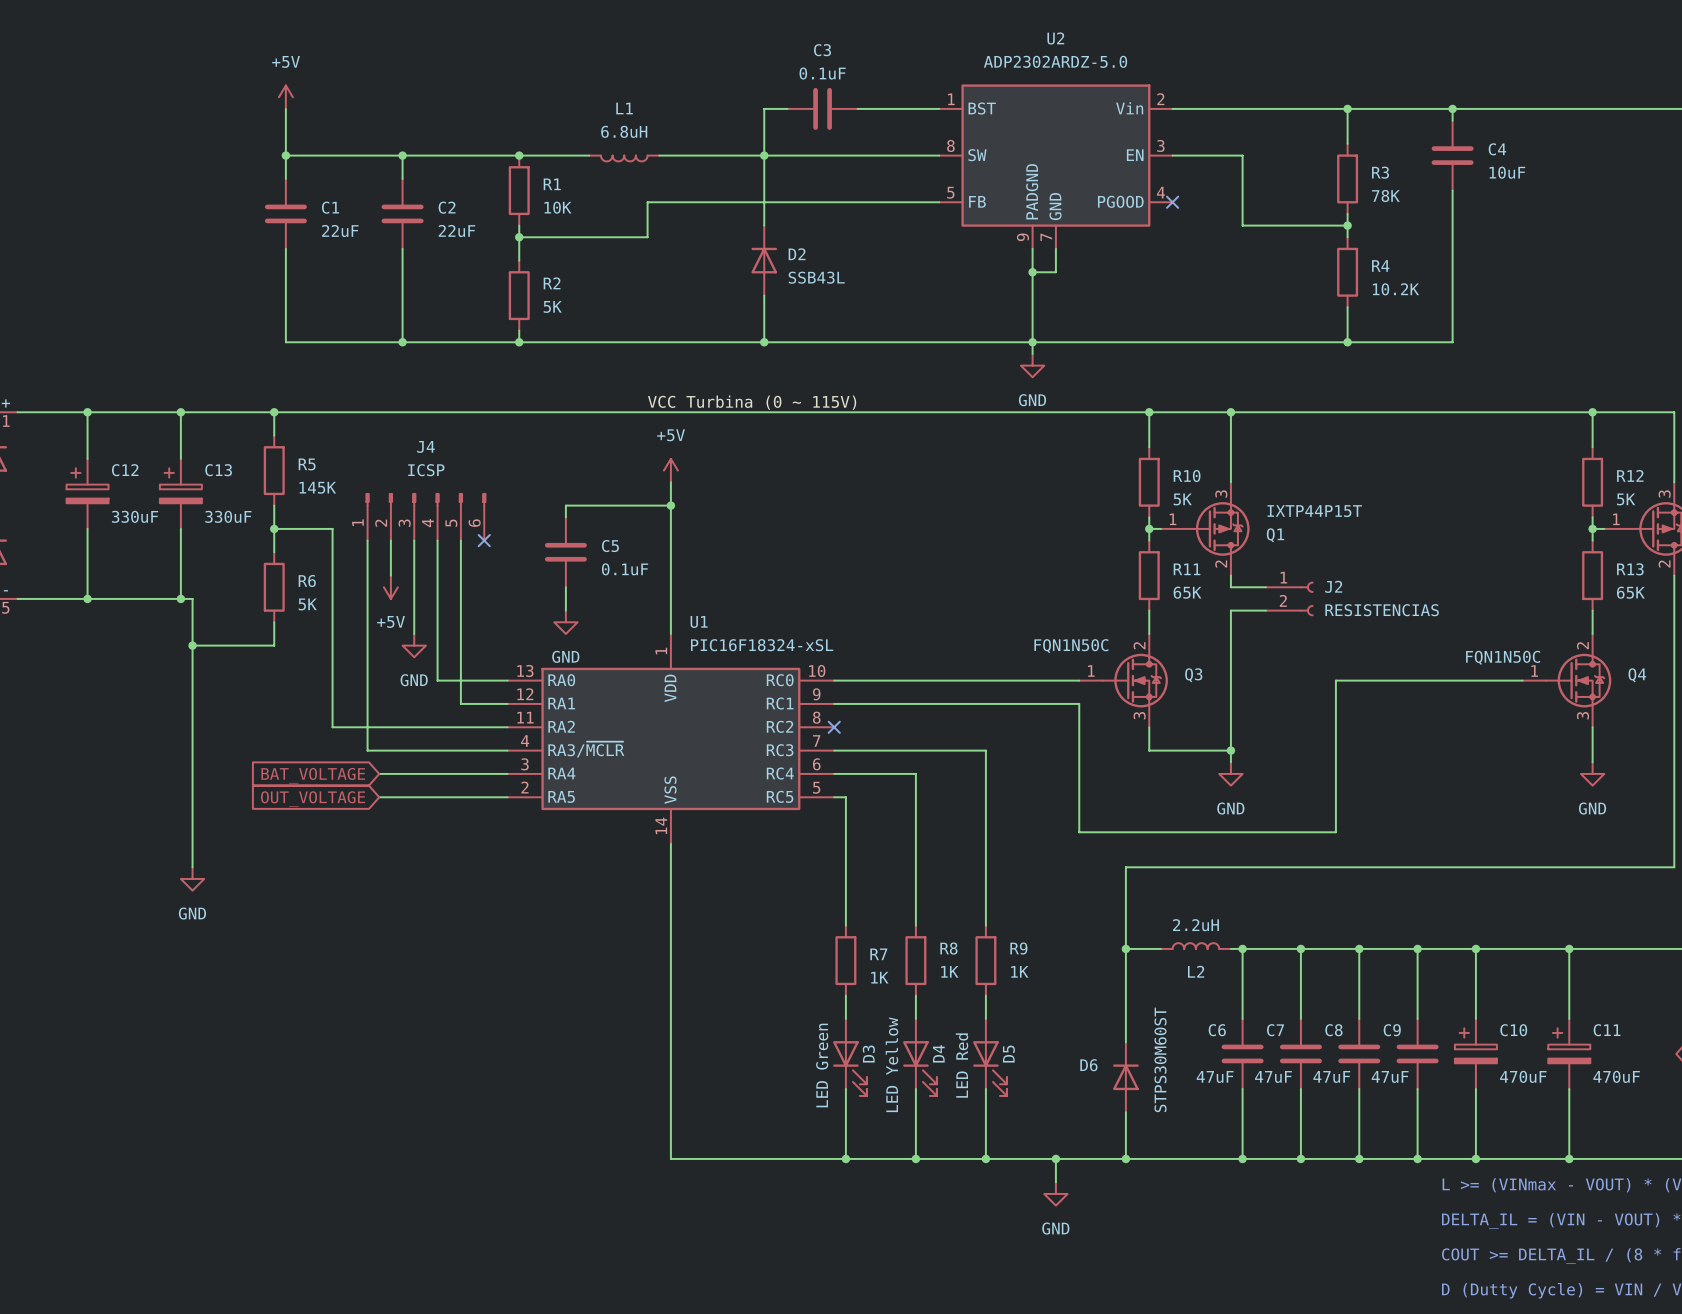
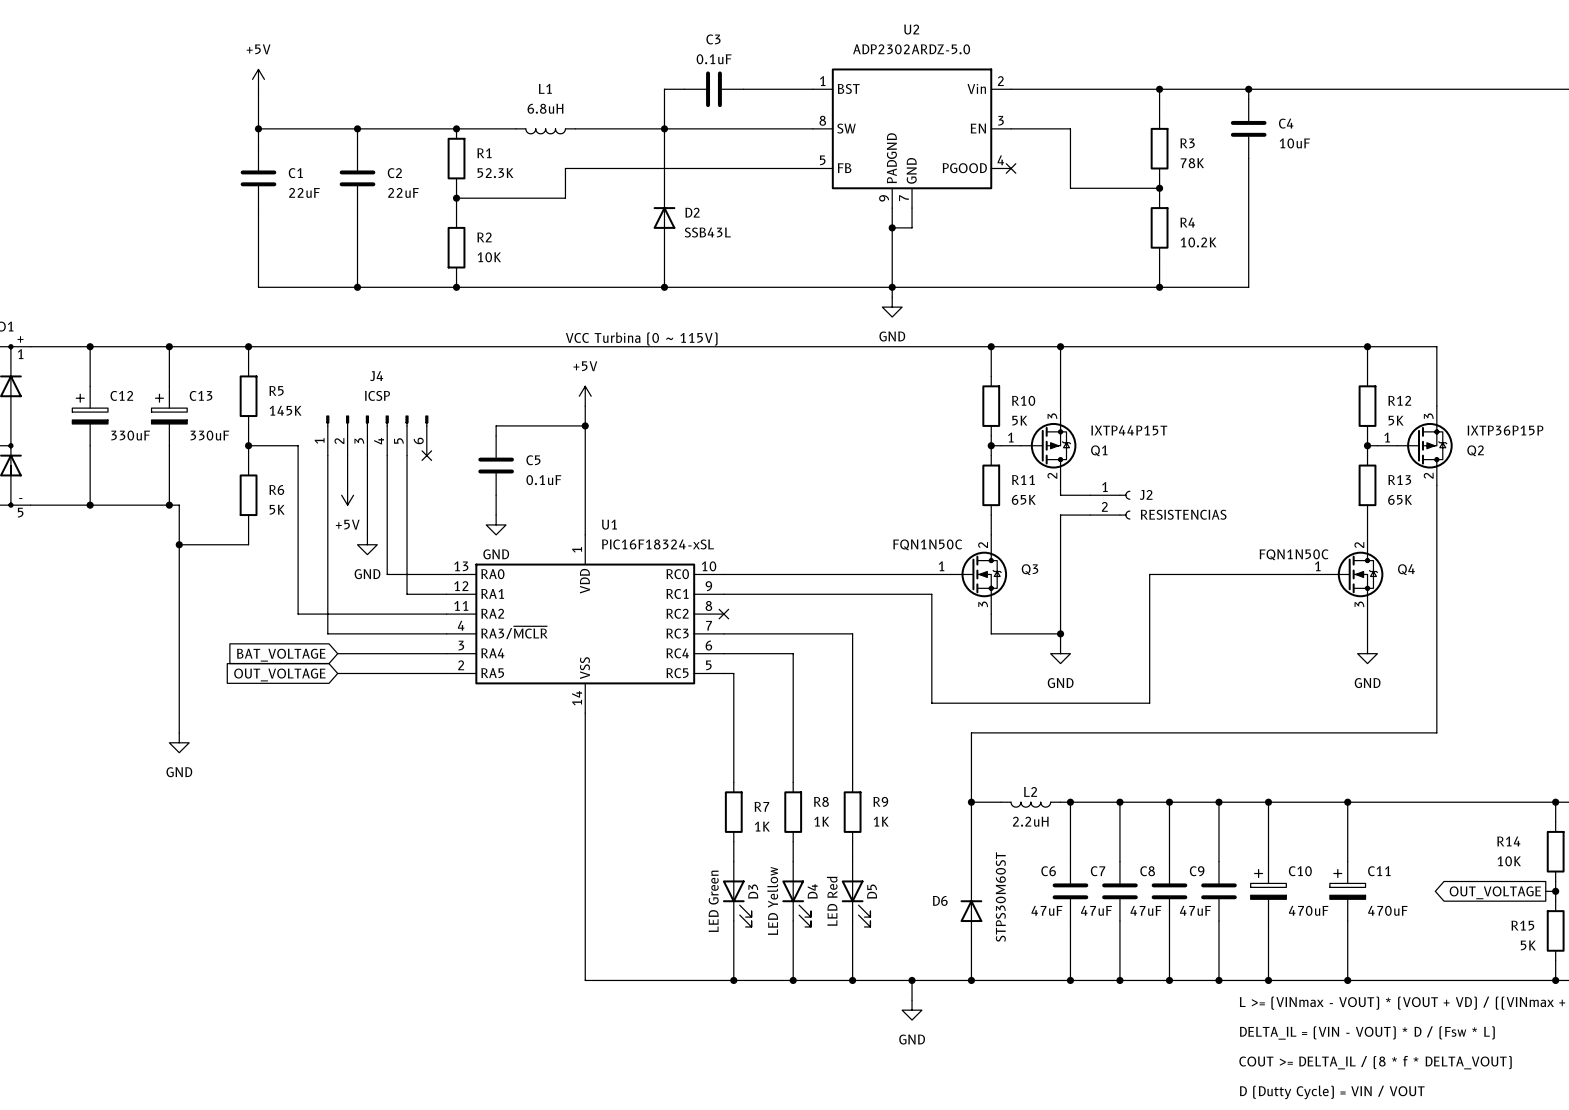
R1 value: 10K (557, 207) -> 52.3K (495, 173)
R2 value: 5K (552, 306) -> 10K (489, 257)
L2 rotation: 0° (1195, 946) -> 180° (1030, 804)

